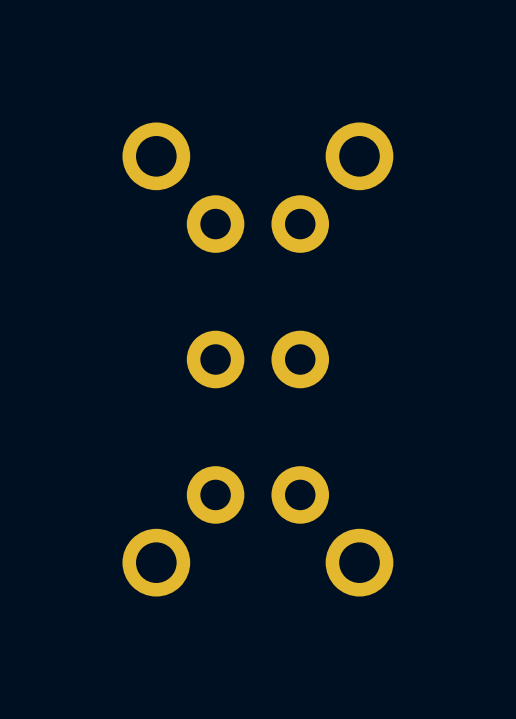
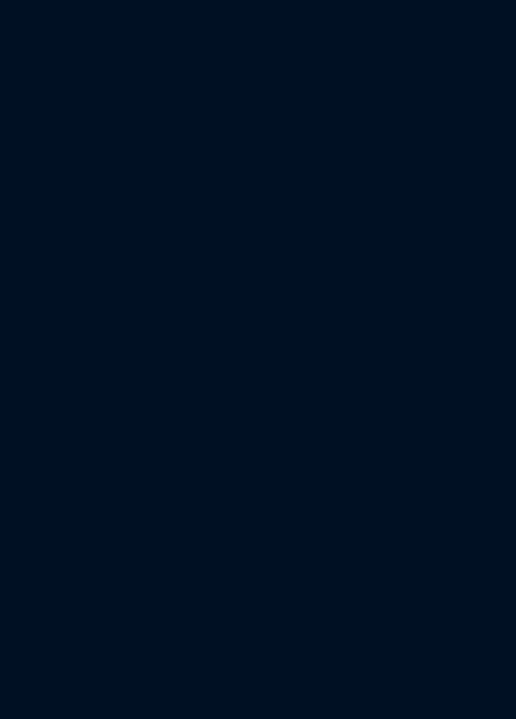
part: (257, 359) -> none

